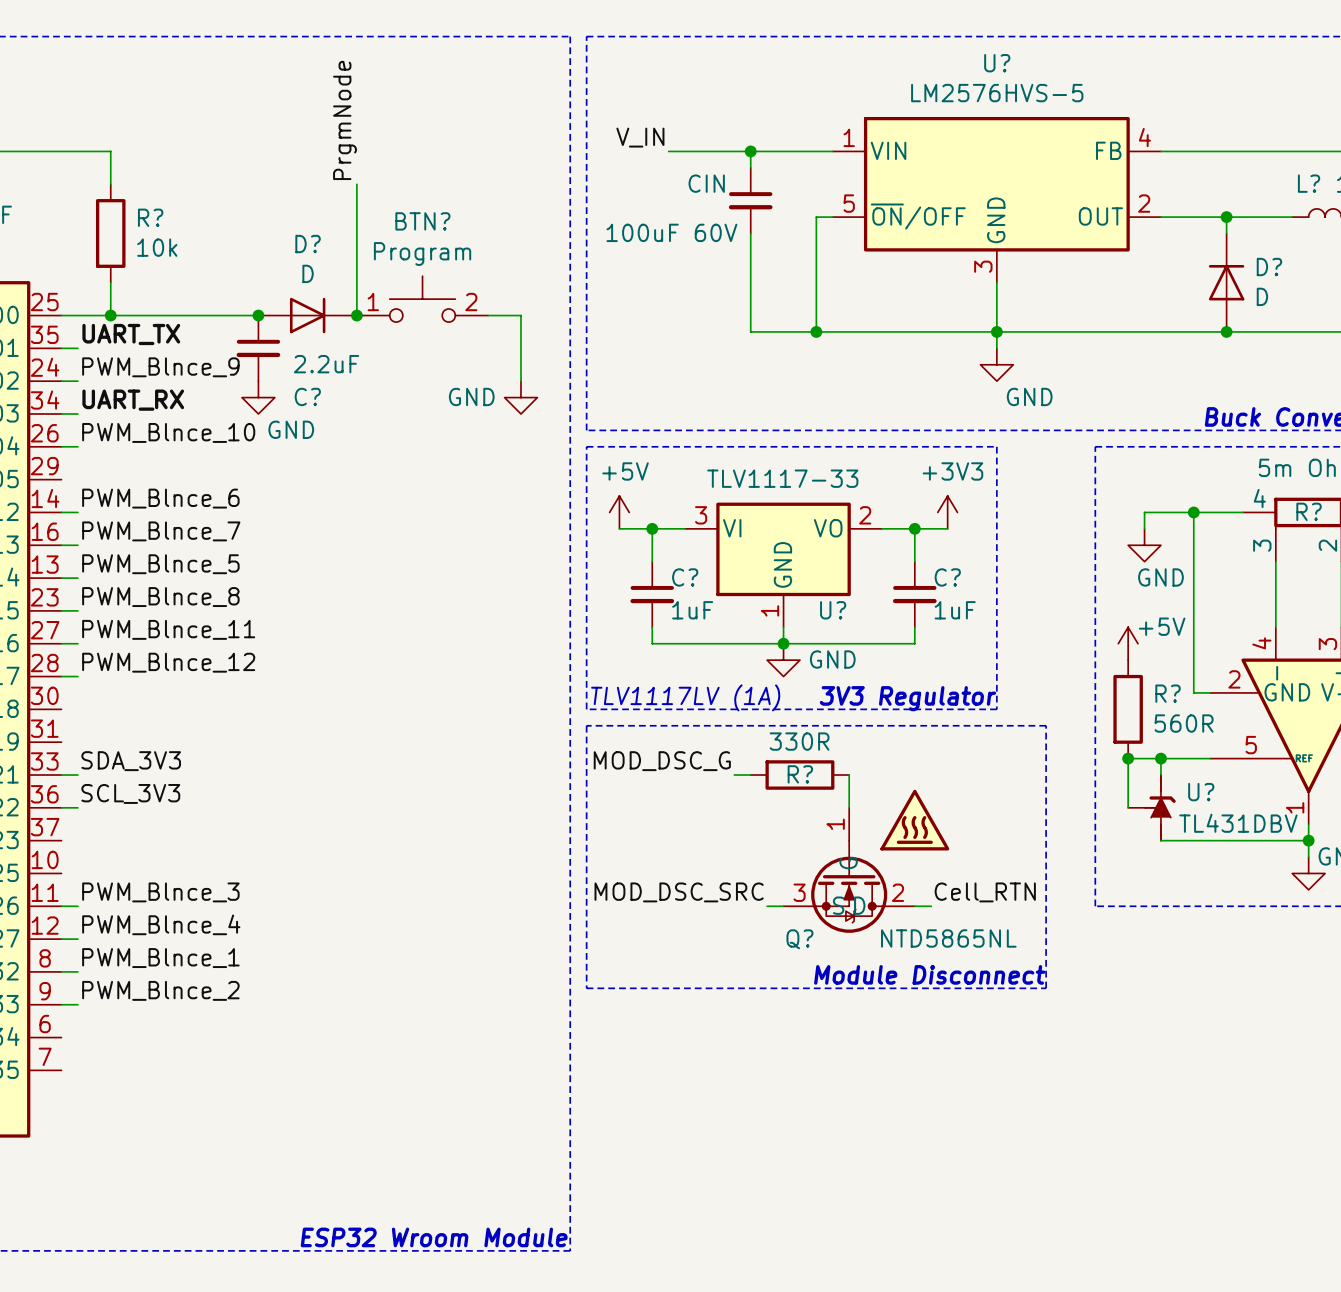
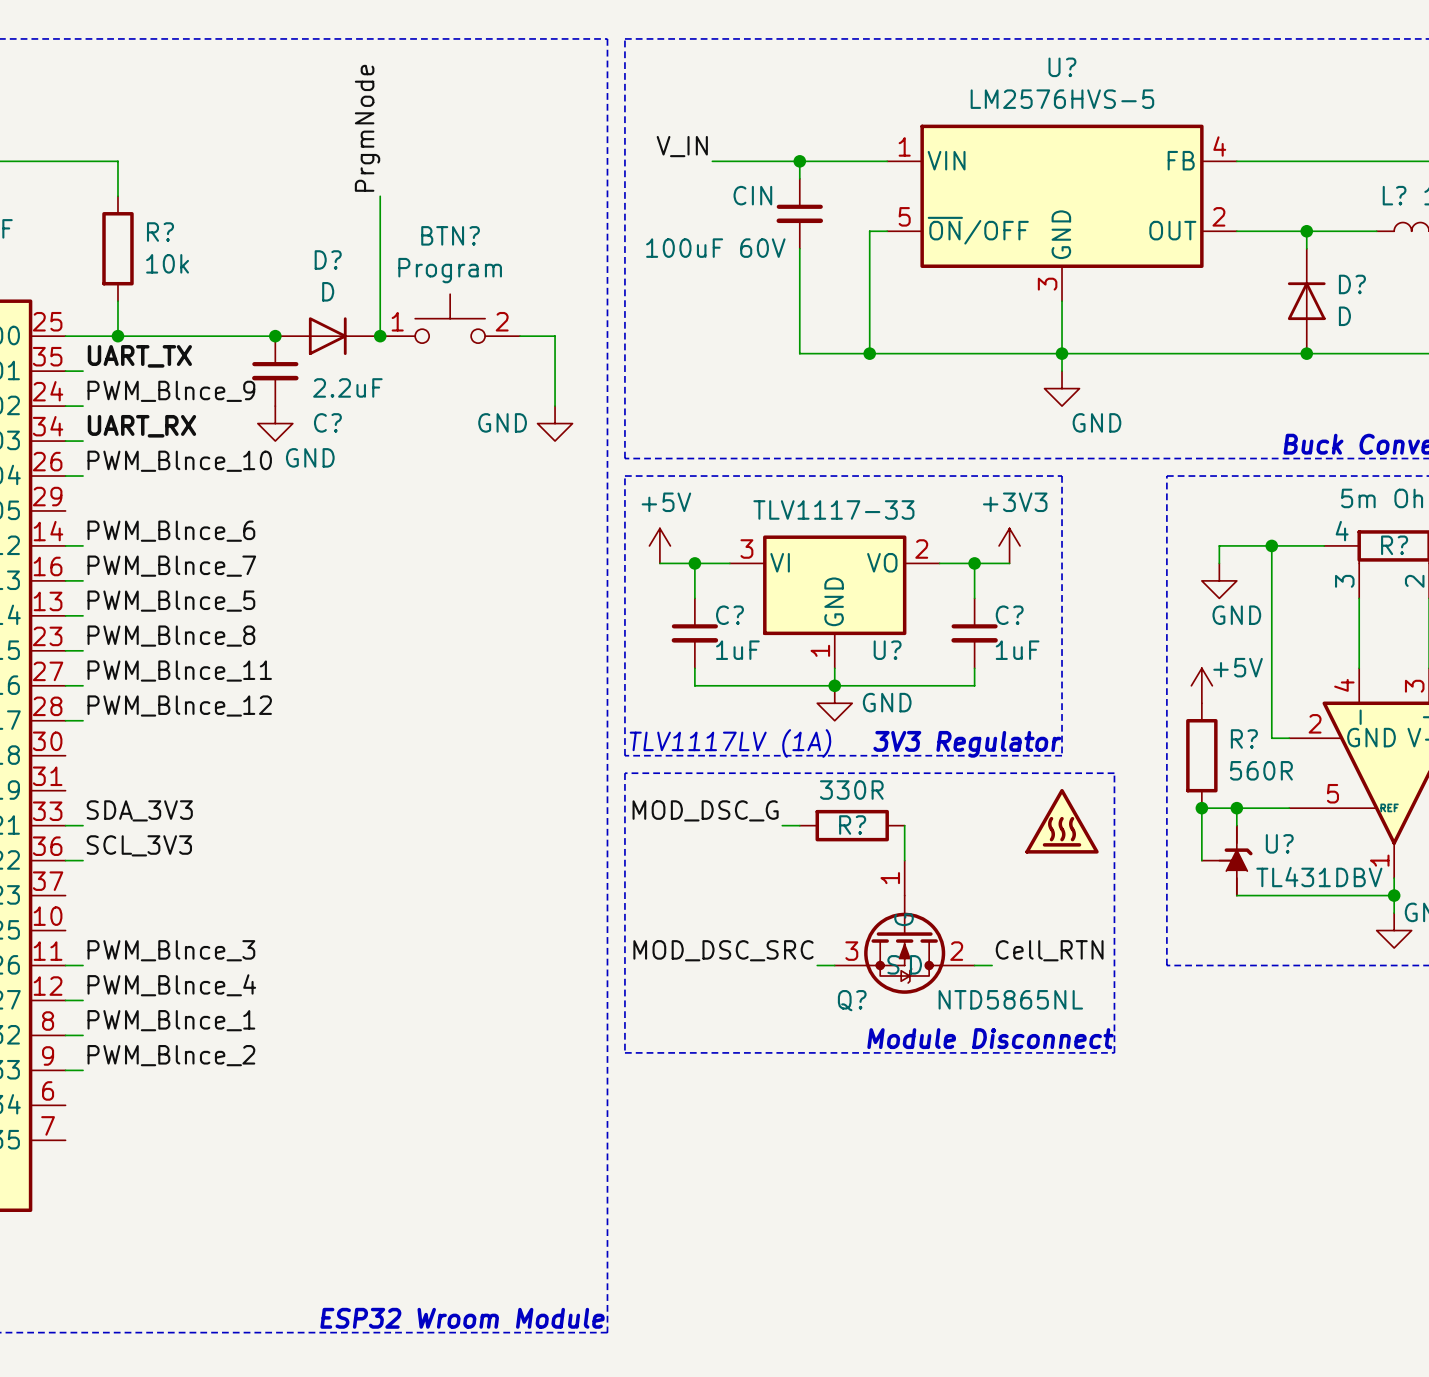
power symbol position: (914, 820) -> (1062, 821)

